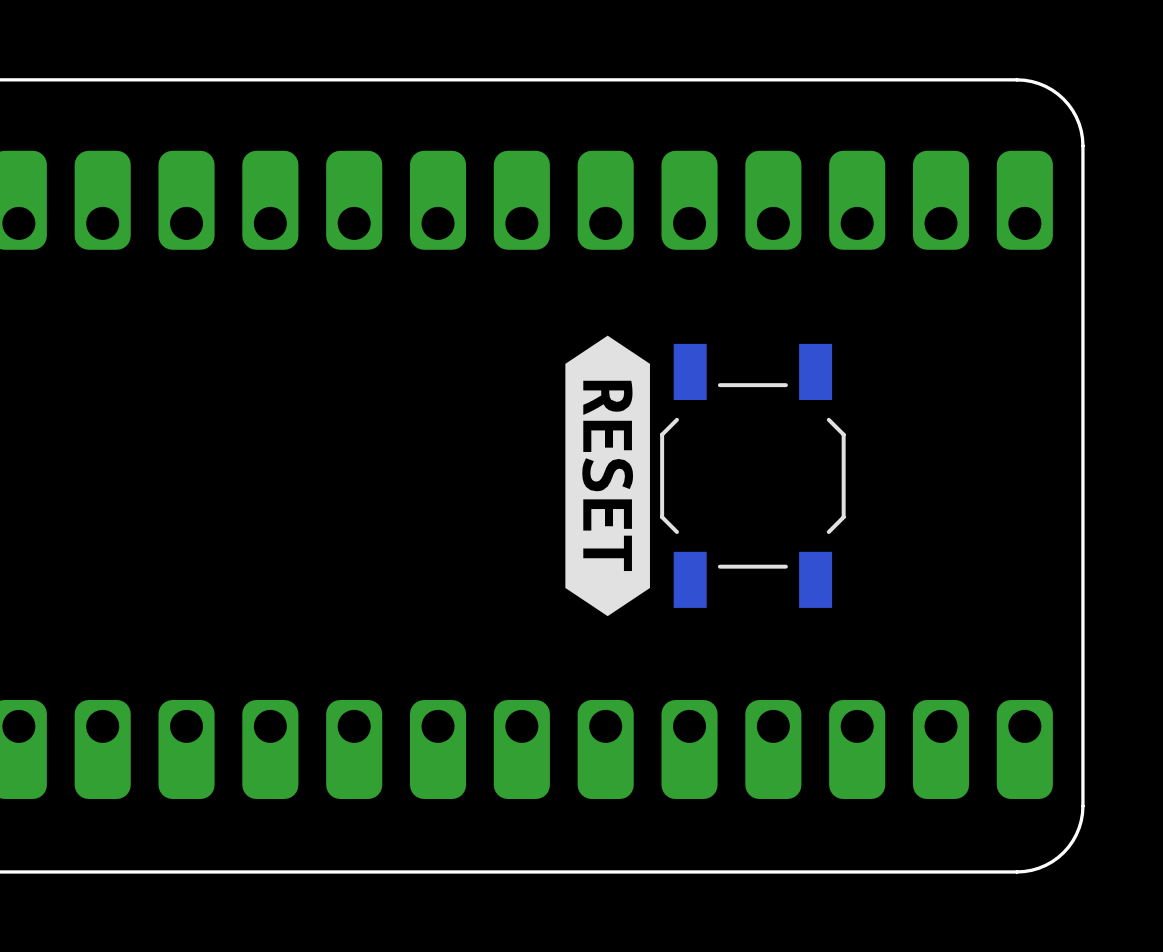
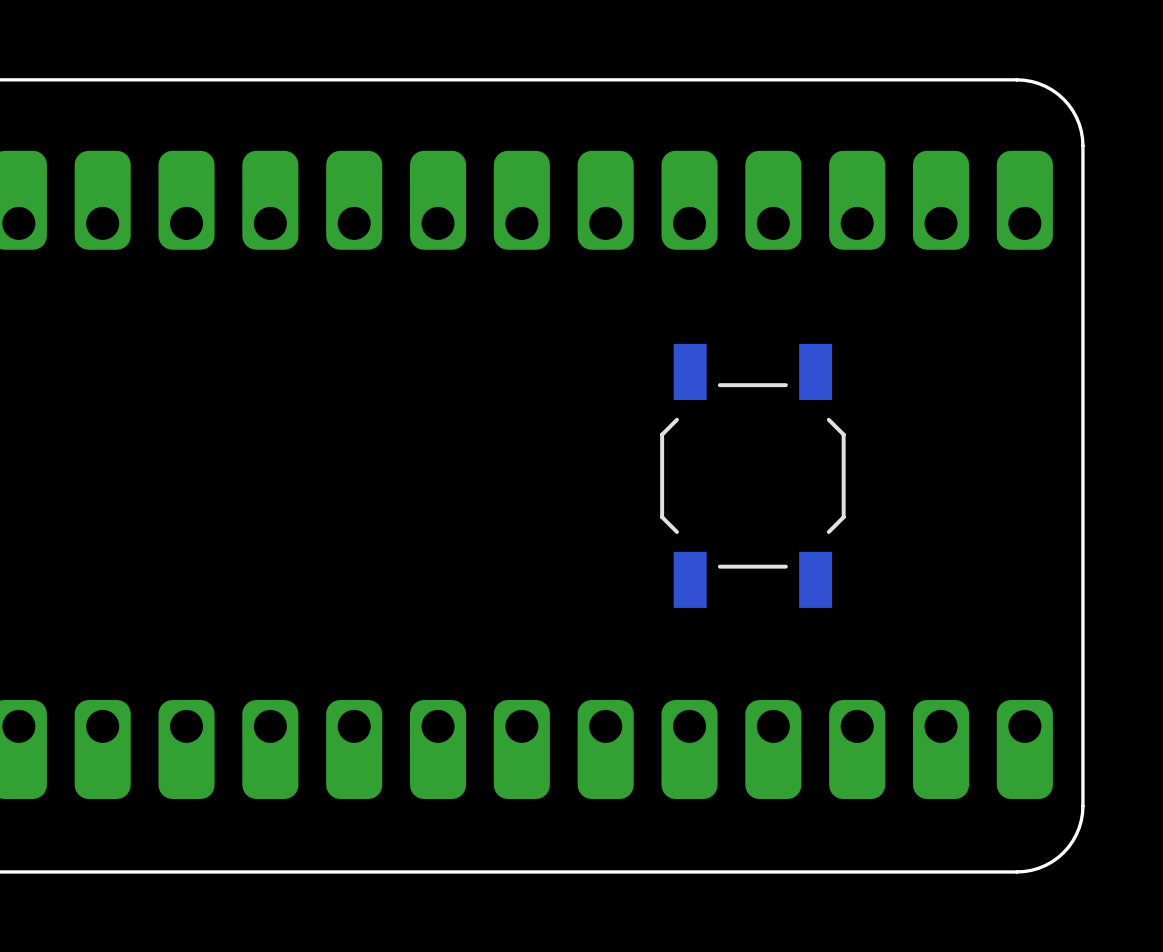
drawing: [565, 335, 650, 617] -> none

